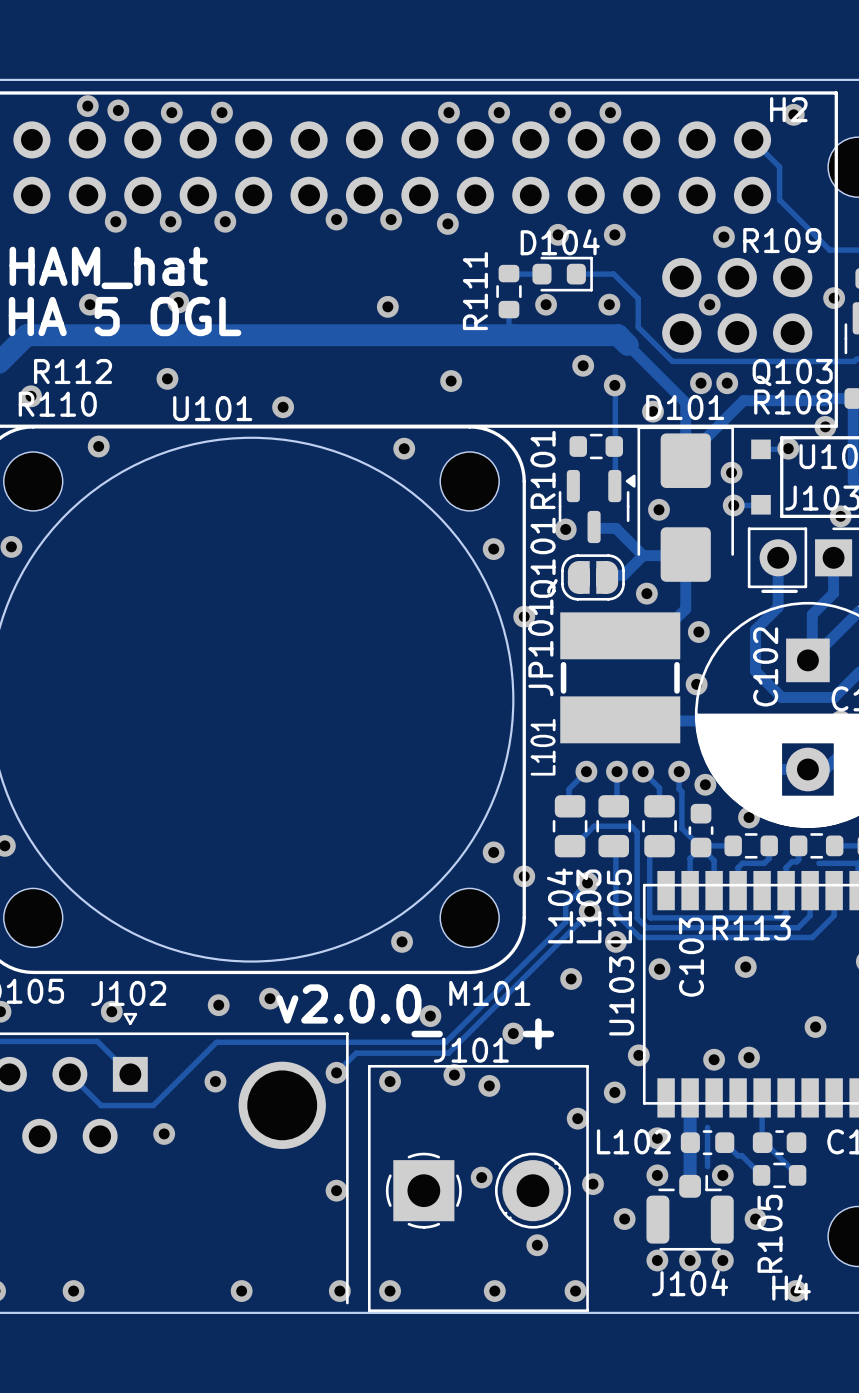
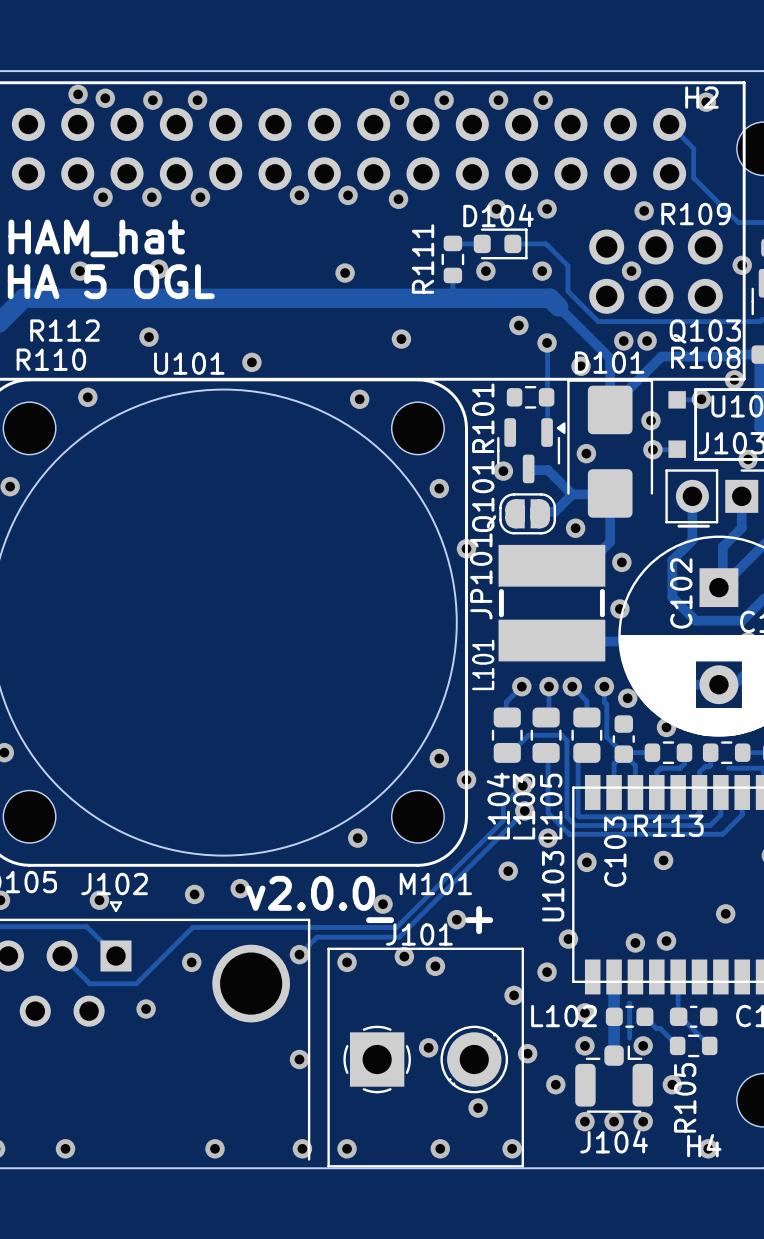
via: (31, 396) -> none

